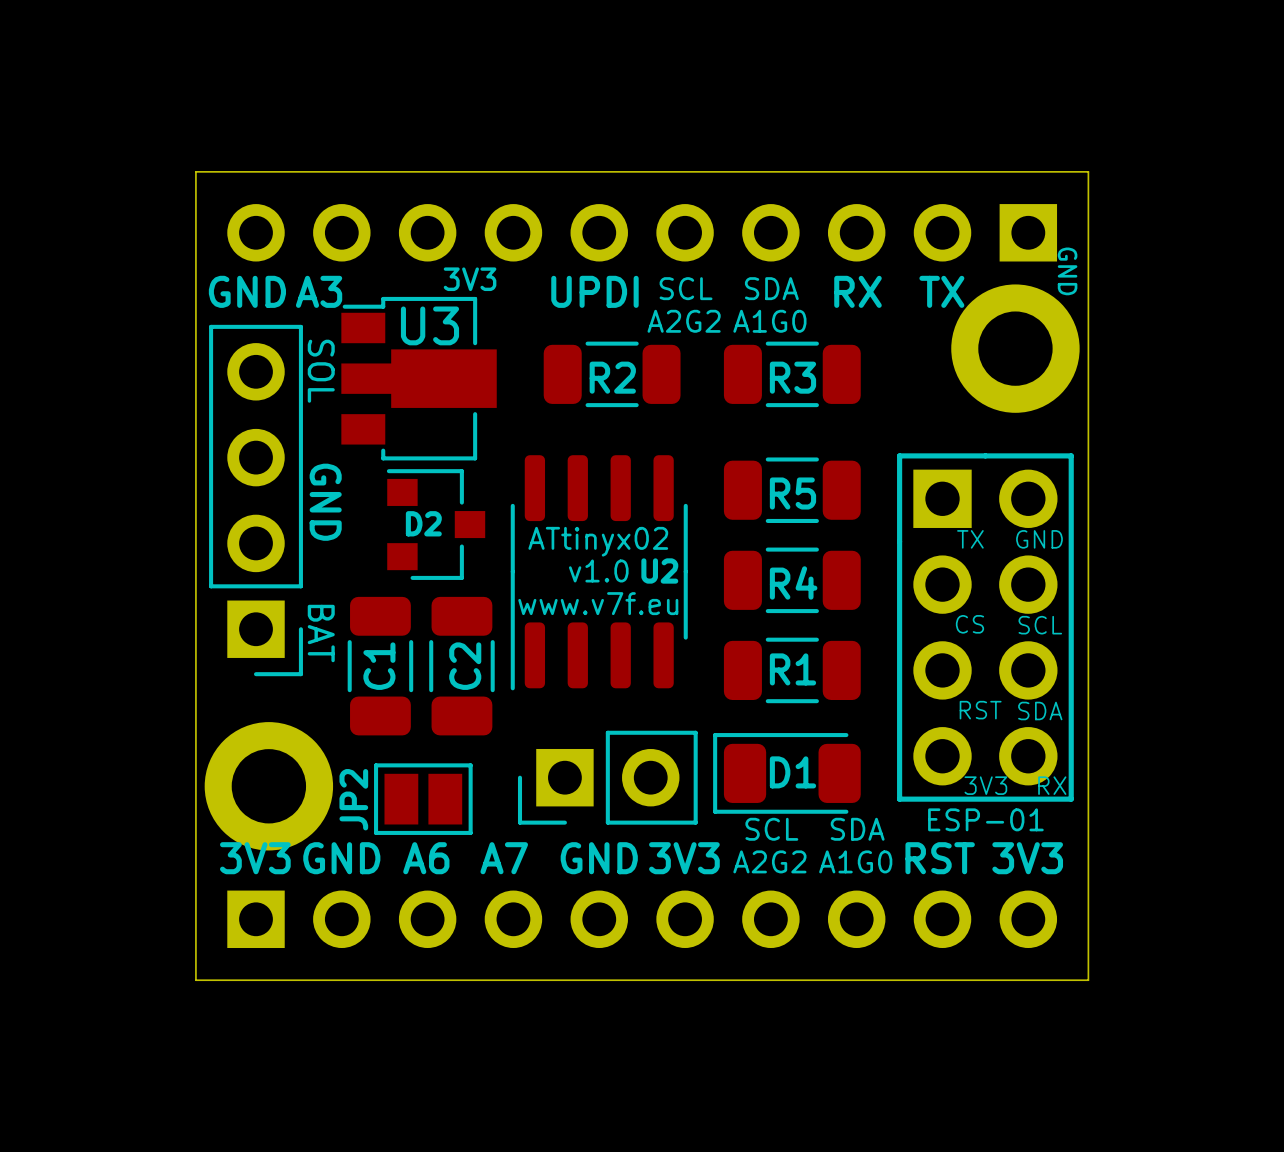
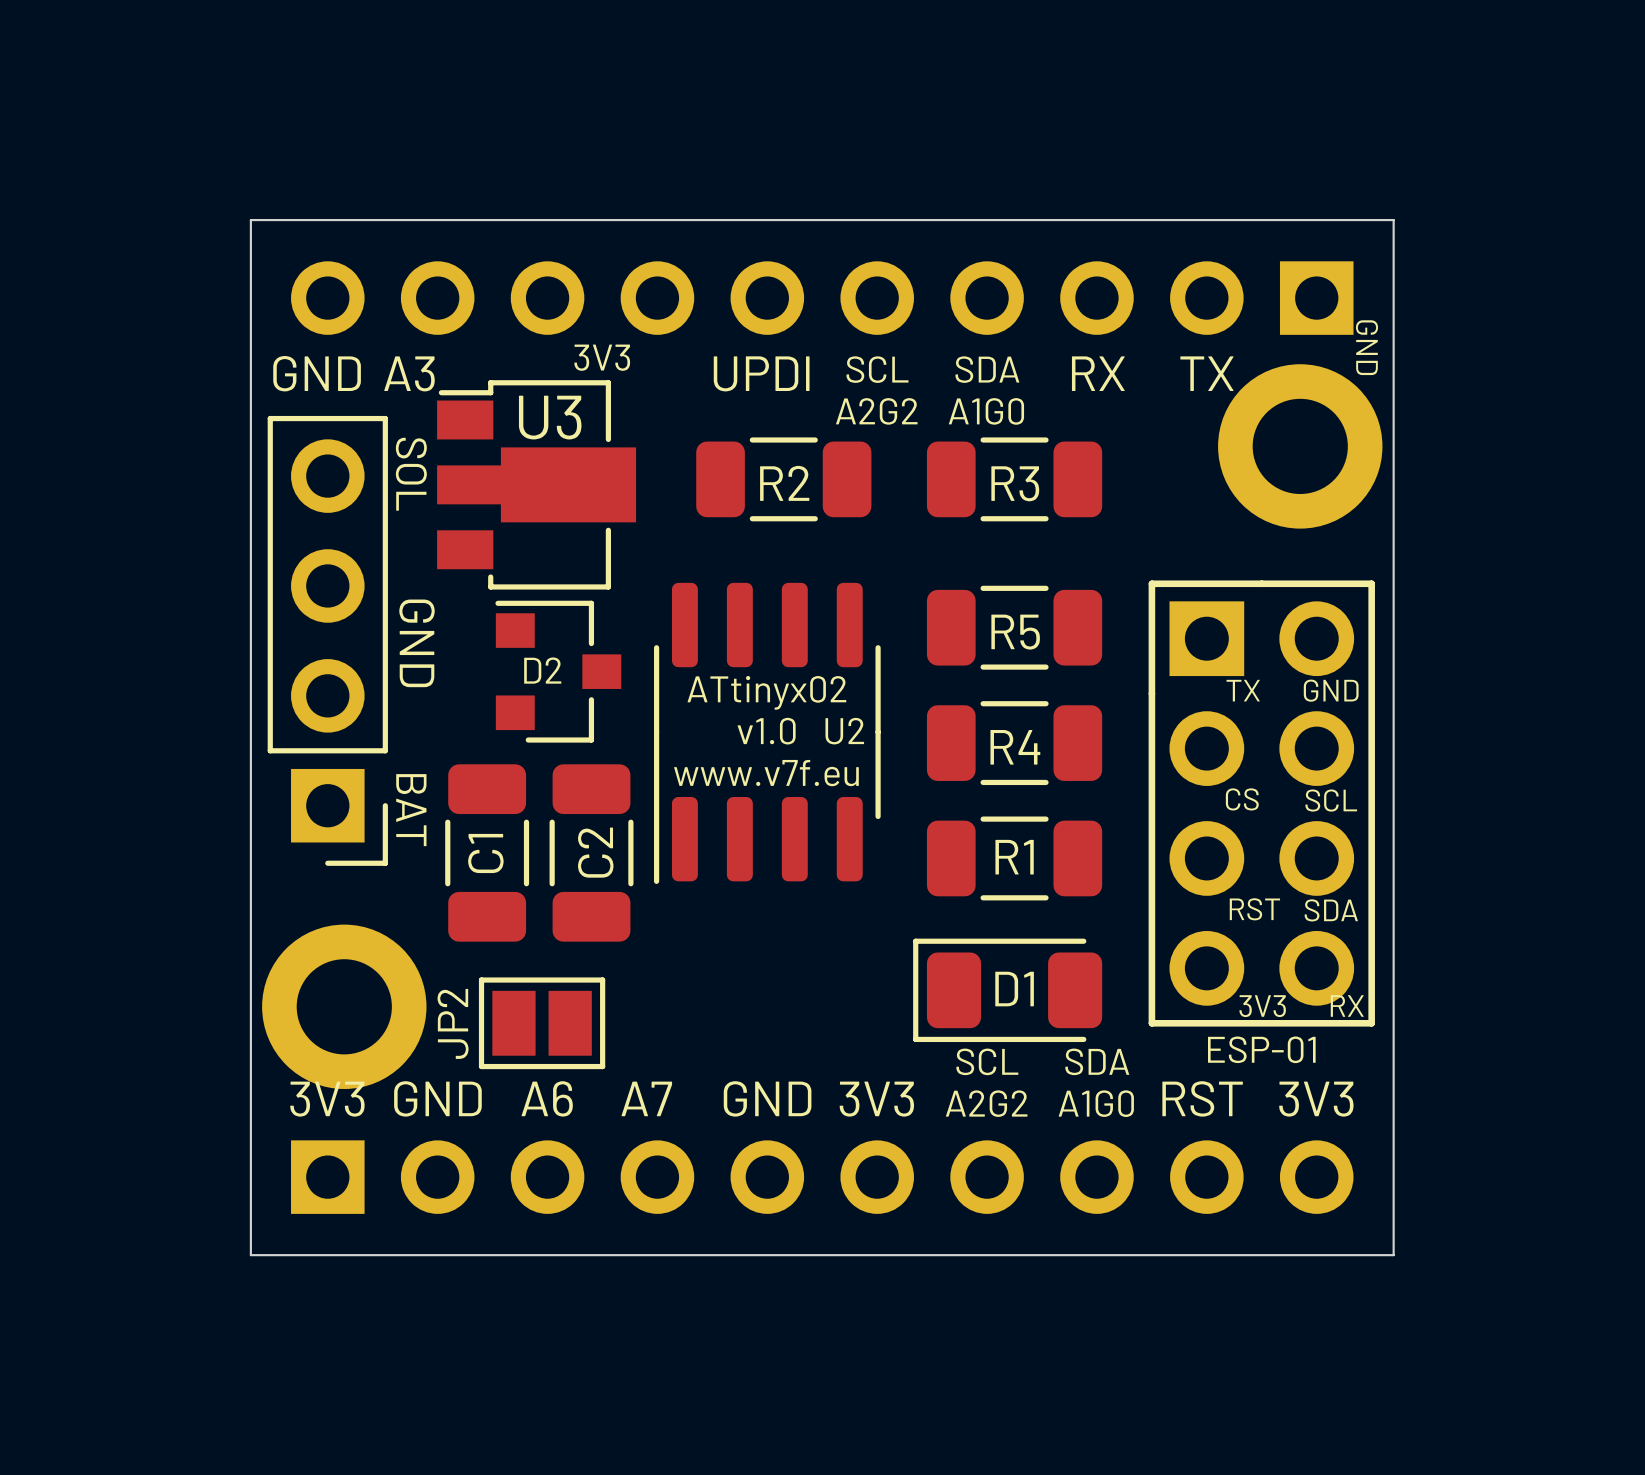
part: (607, 777) -> none

